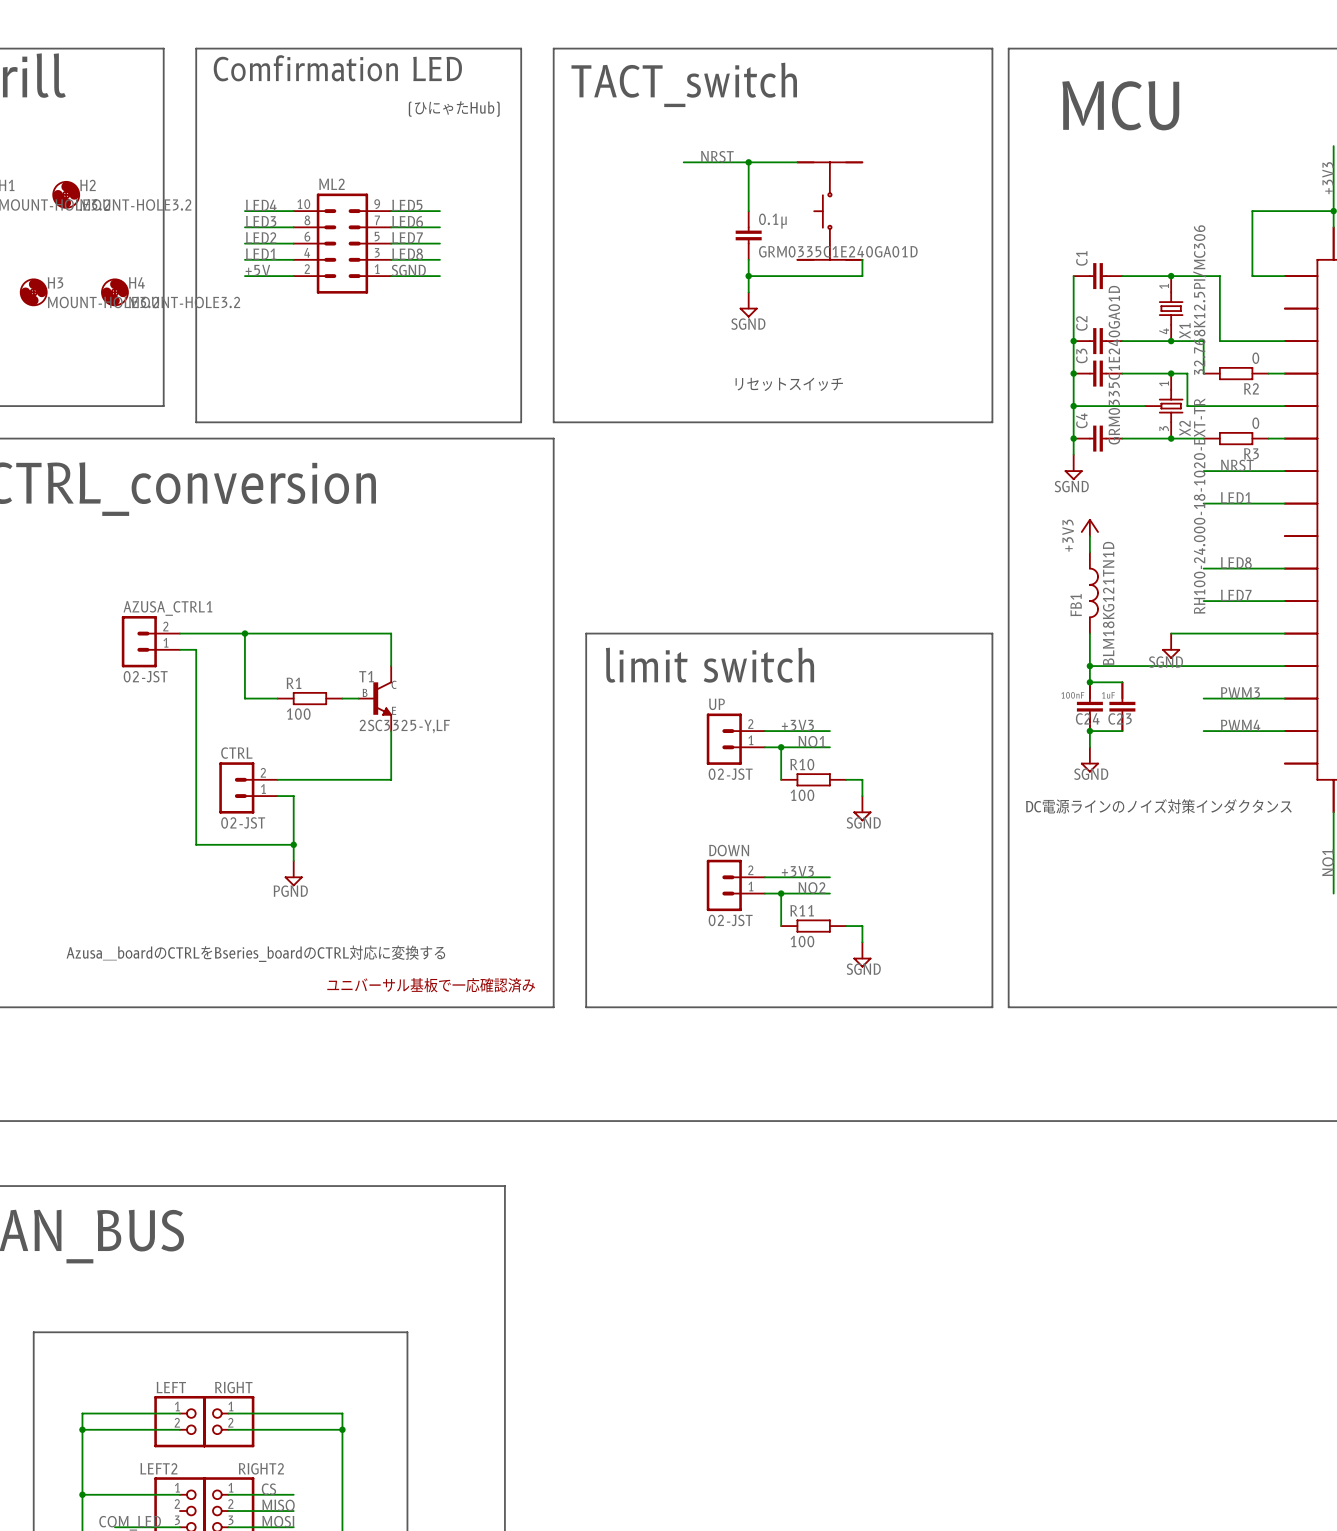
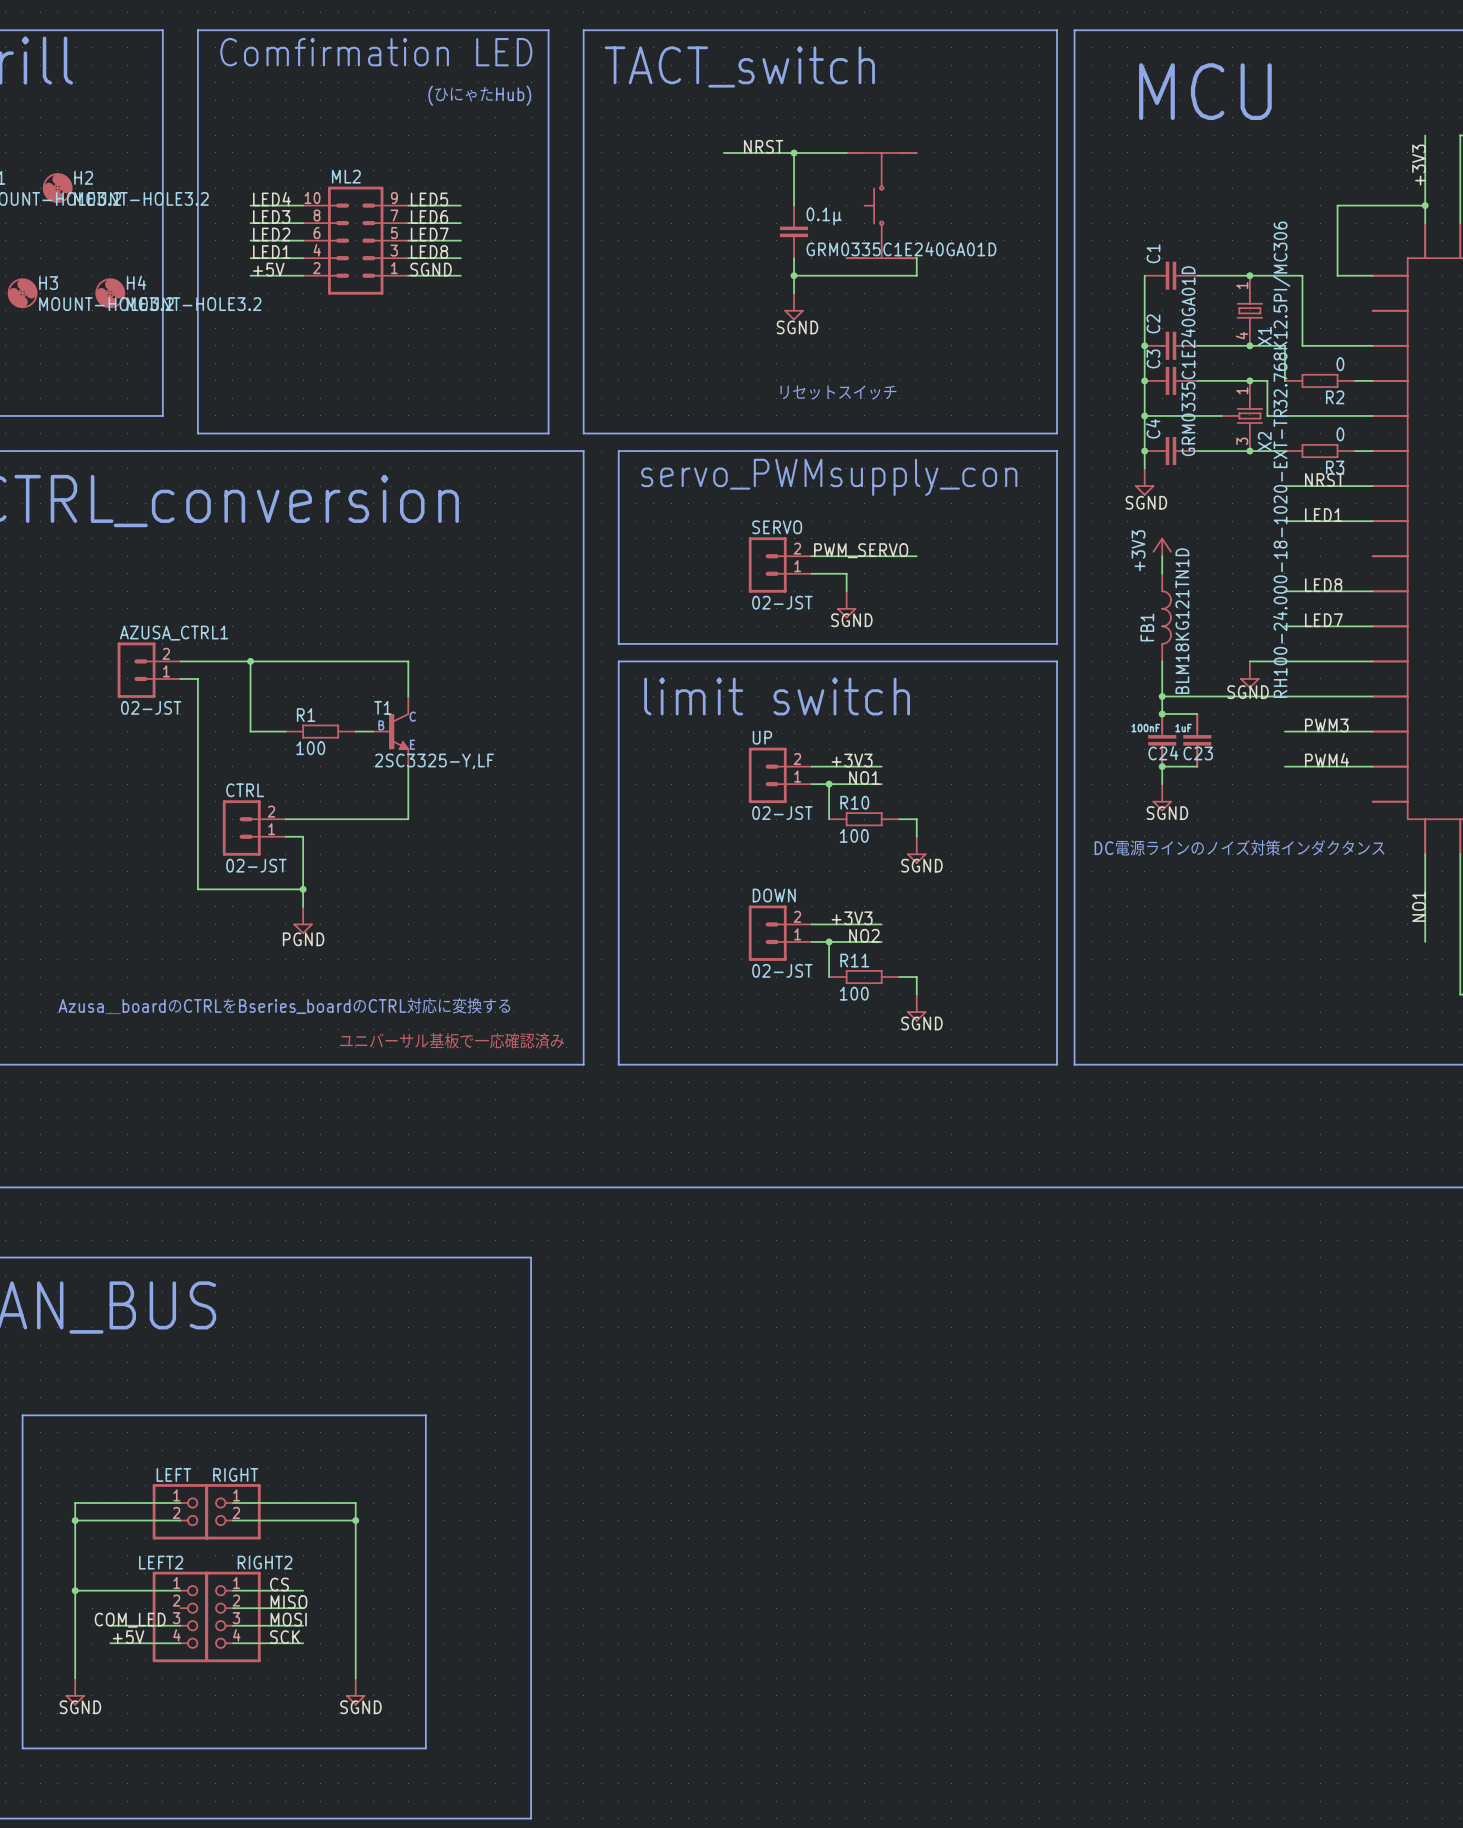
line: none -> (618, 451) (618, 643) (1057, 643) (1057, 451) (618, 451)
text: none -> servo_PWMsupply_con (829, 477)
label: none -> PWM_SERVO (861, 550)
wire: none -> (811, 556) (916, 556)
SERVO: none -> 02-JST (780, 565)
wire: none -> (811, 573) (846, 573) (846, 591)
power symbol: none -> (846, 604)
label: none -> SGND (851, 620)

